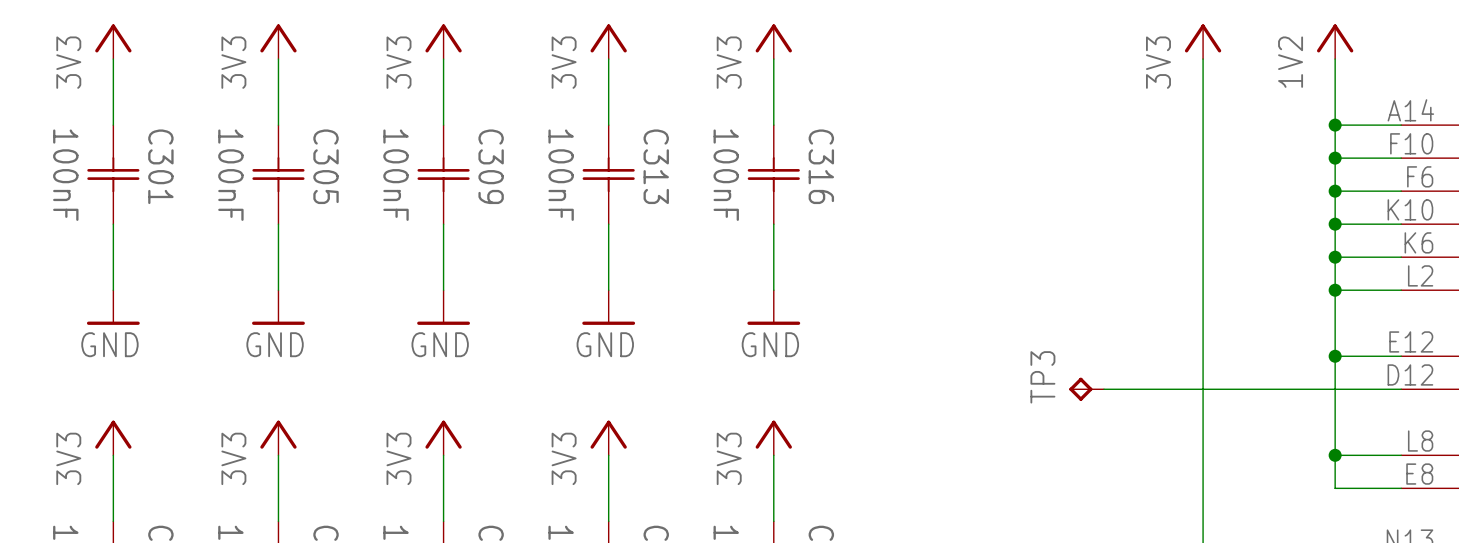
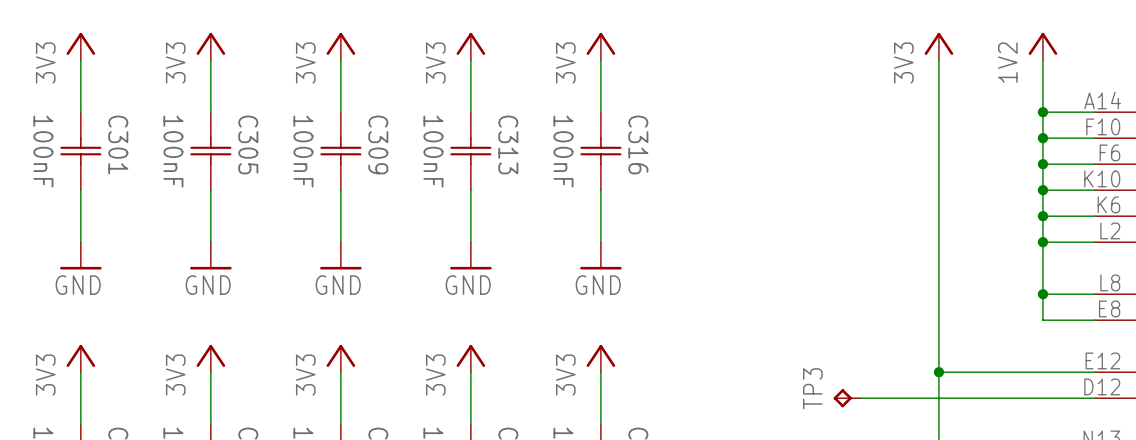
part pin number: E12 (1411, 341) -> L8 (1110, 282)
part pin number: D12 (1410, 374) -> E8 (1109, 308)
TP3 position: (1086, 389) -> (847, 398)
wire: (1104, 389) (1335, 389) (1335, 488) -> (860, 398) (1042, 398)
part pin number: L8 (1420, 441) -> E12 (1102, 360)
wire: none -> (938, 372) (1042, 372)
junction: none -> (938, 372)
junction: (1335, 455) -> none
part pin number: E8 (1419, 474) -> D12 (1102, 386)

